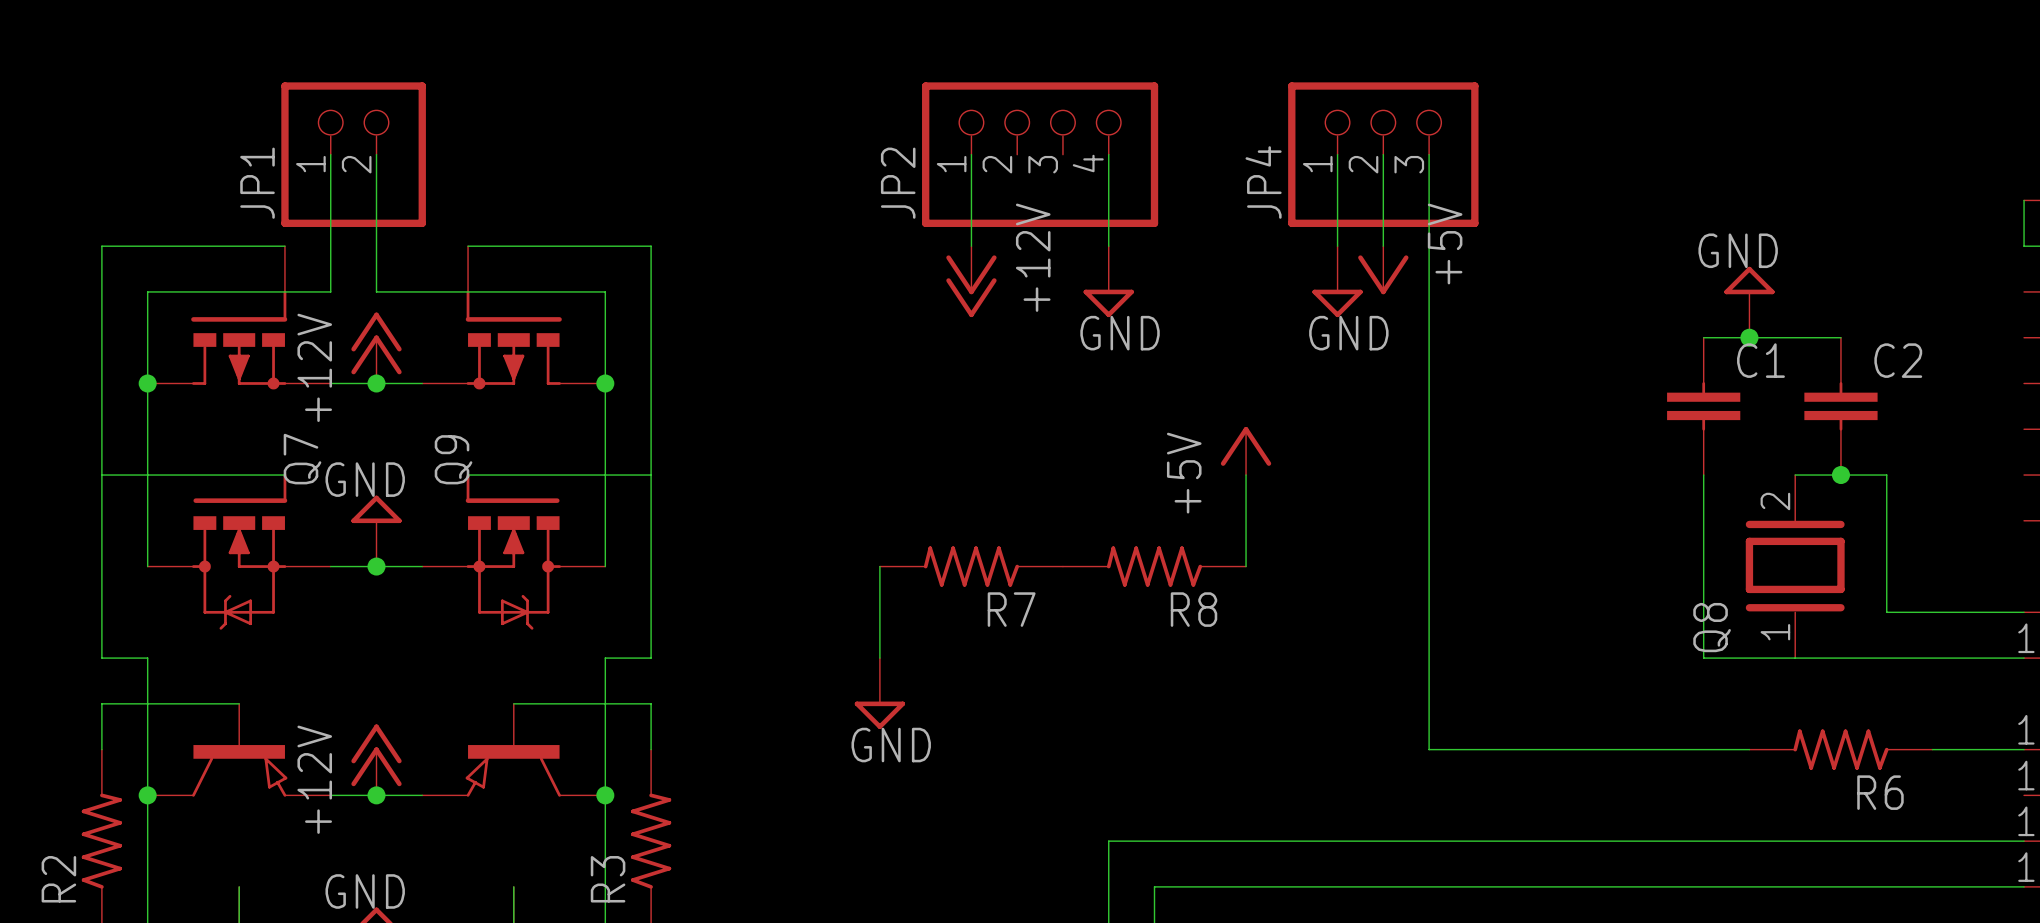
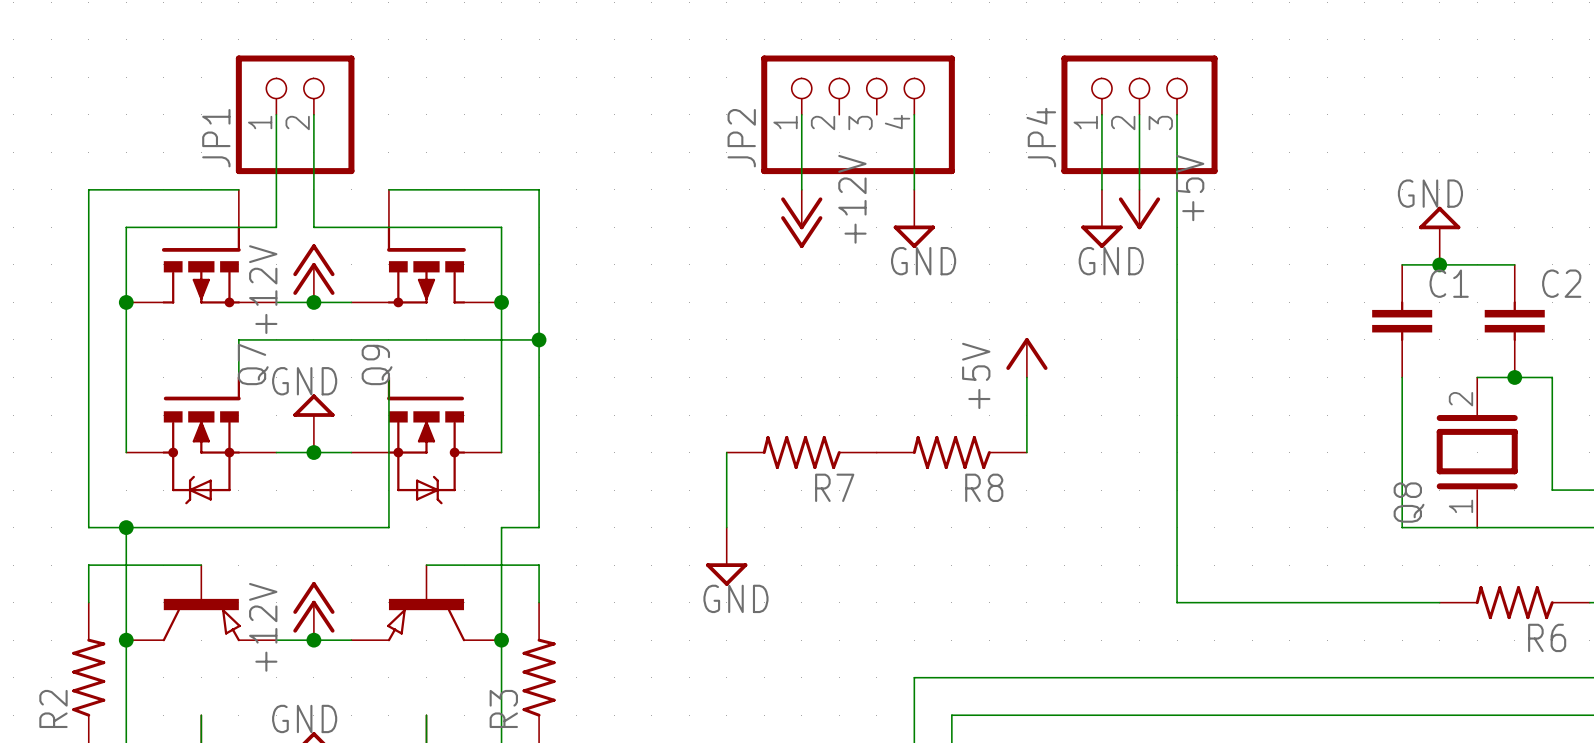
junction: none -> (539, 339)
wire: (101, 475) (284, 475) -> (539, 339) (238, 339) (238, 377)
wire: (468, 475) (651, 475) -> (388, 377) (388, 527) (126, 527)
junction: none -> (126, 527)

